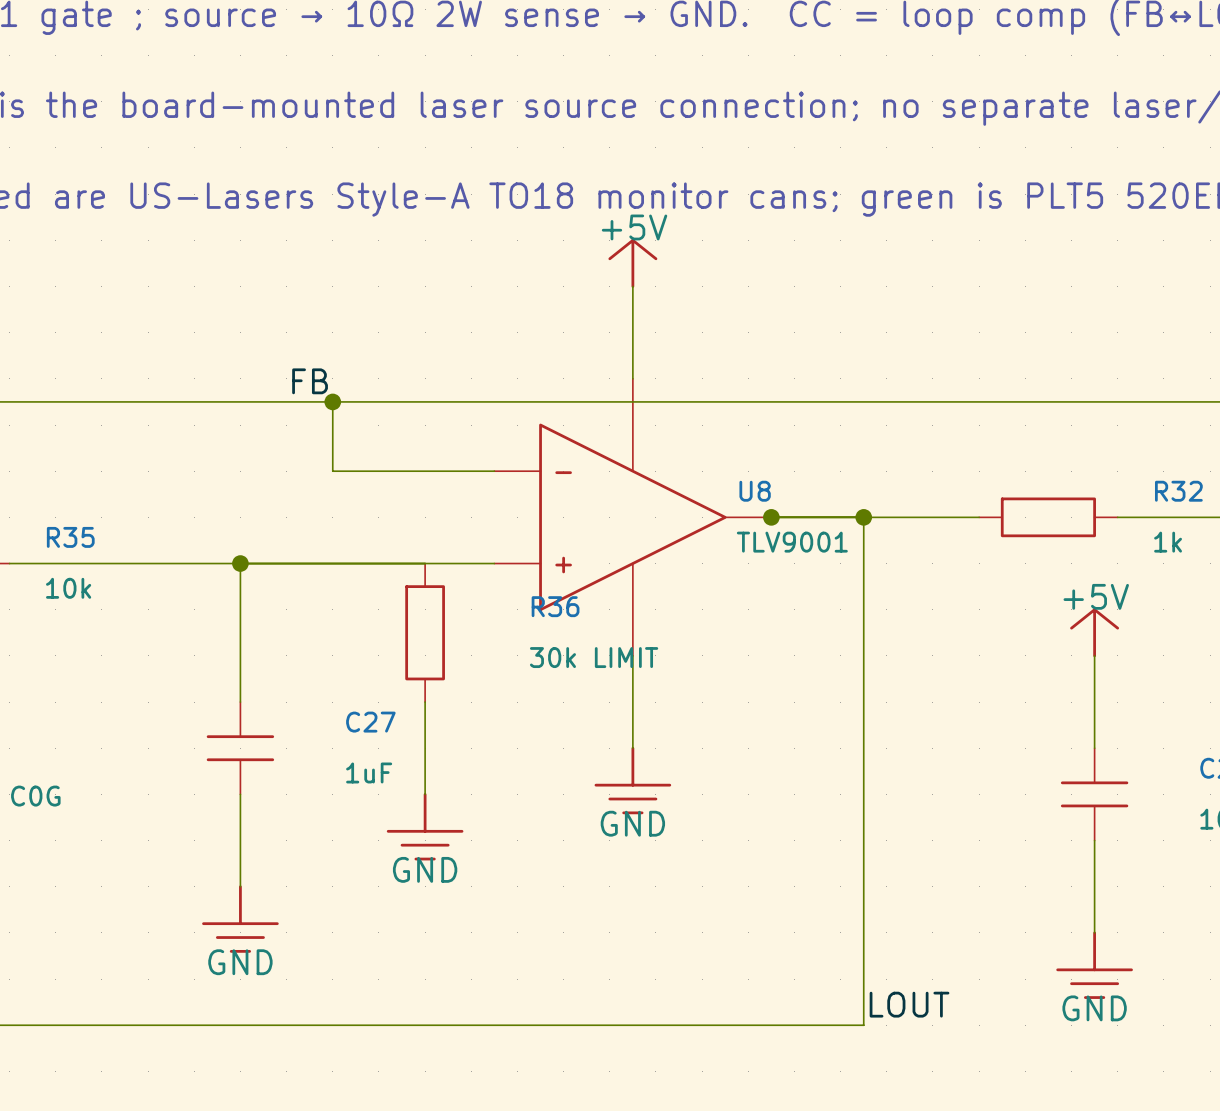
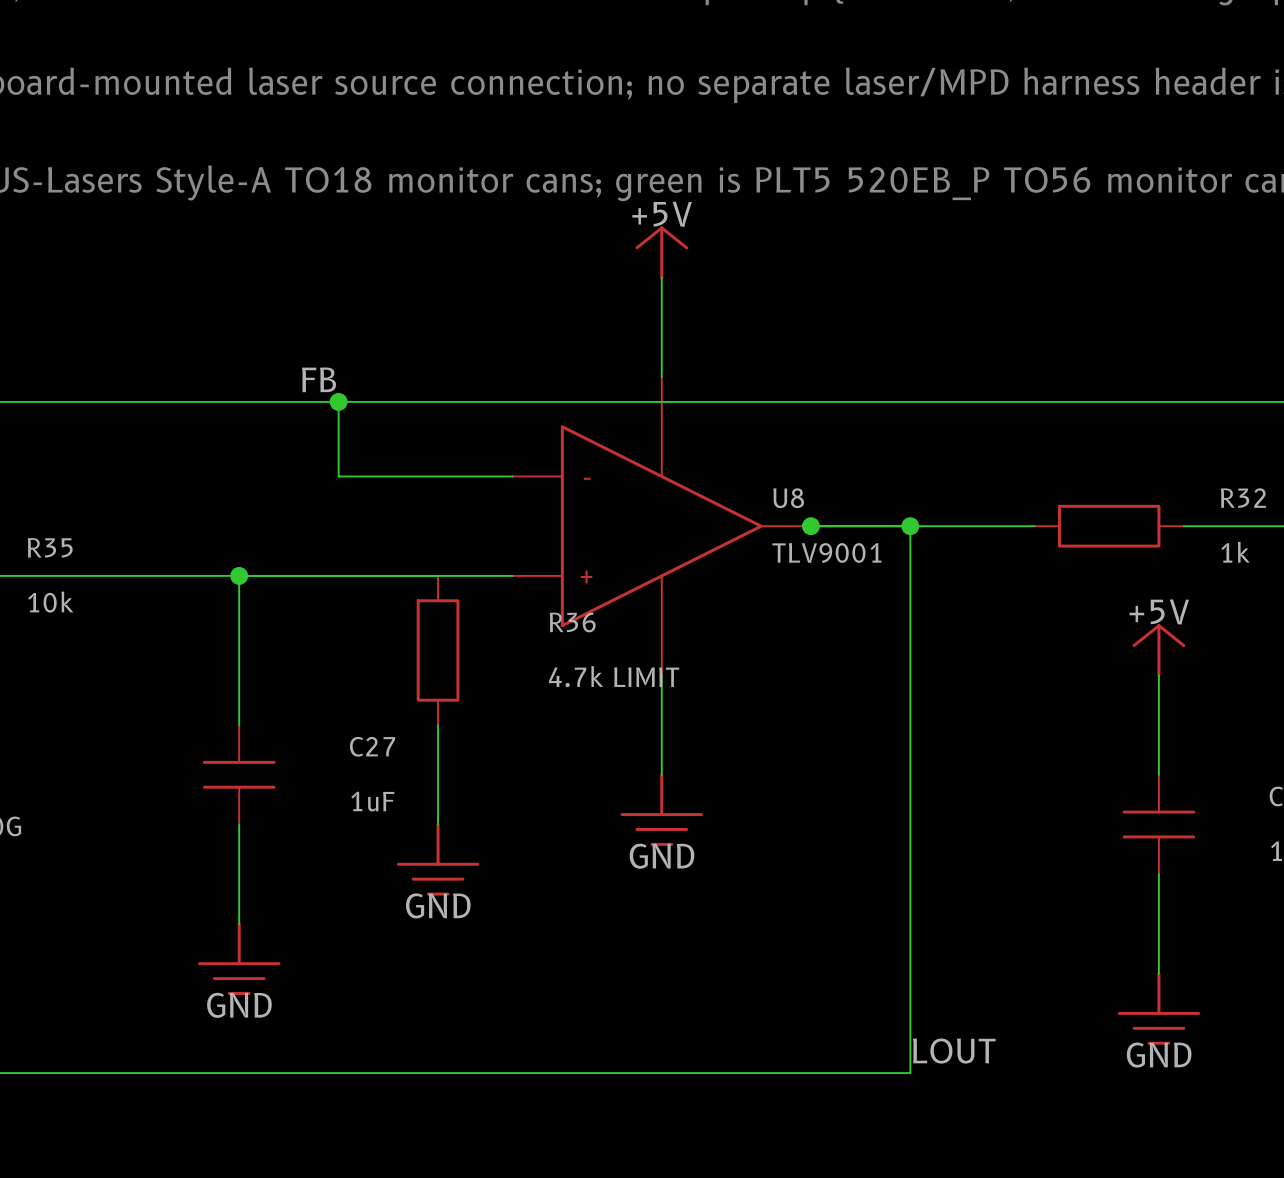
R36 value: 30k LIMIT (594, 657) -> 4.7k LIMIT (614, 676)

